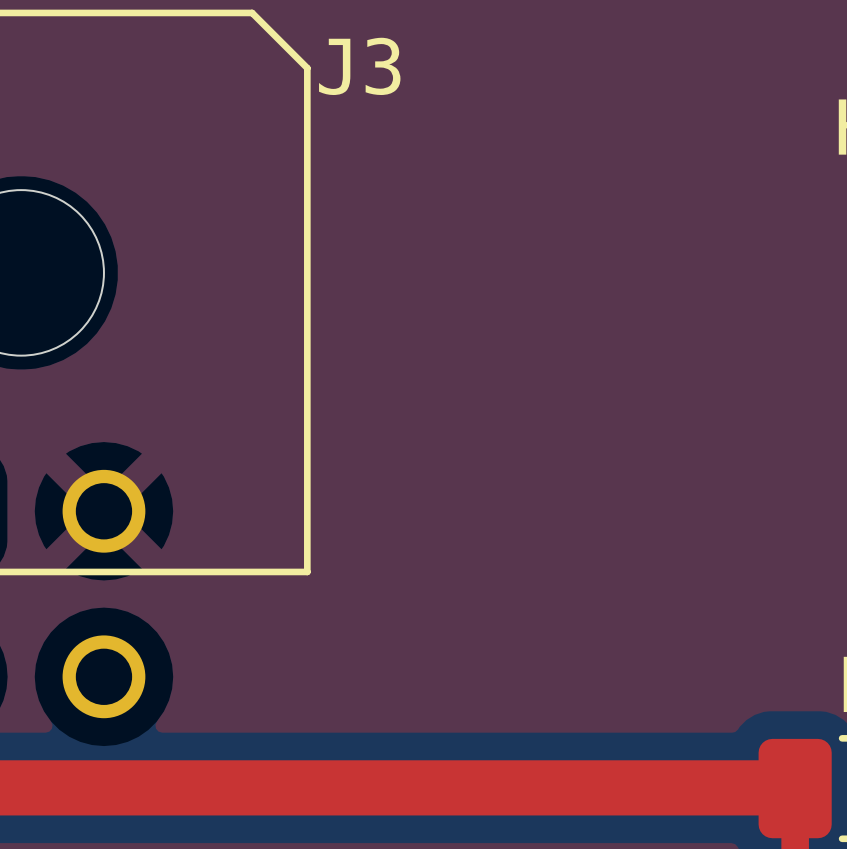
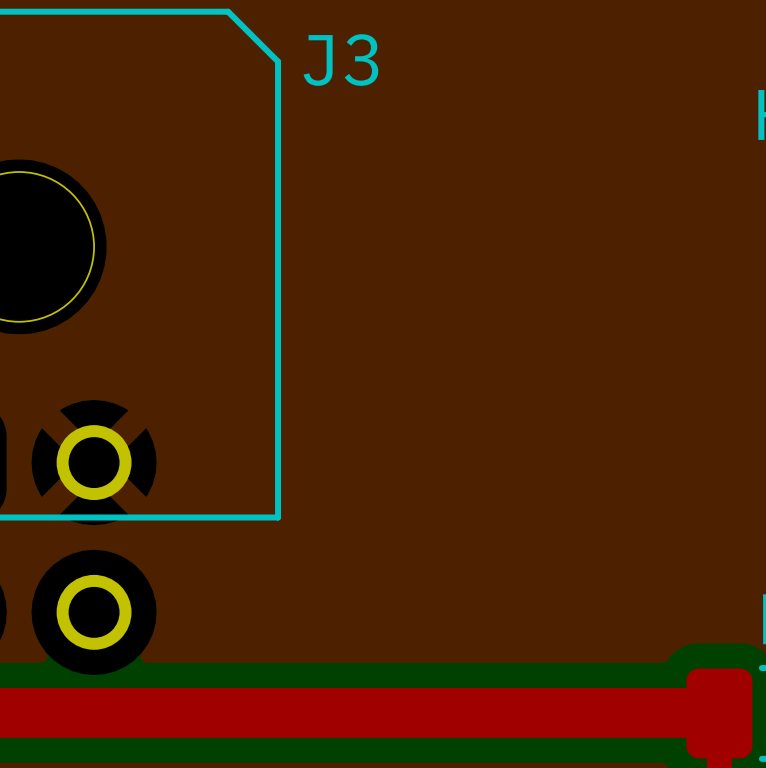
J3 name position: J3 (359, 66) -> J3 (340, 60)

